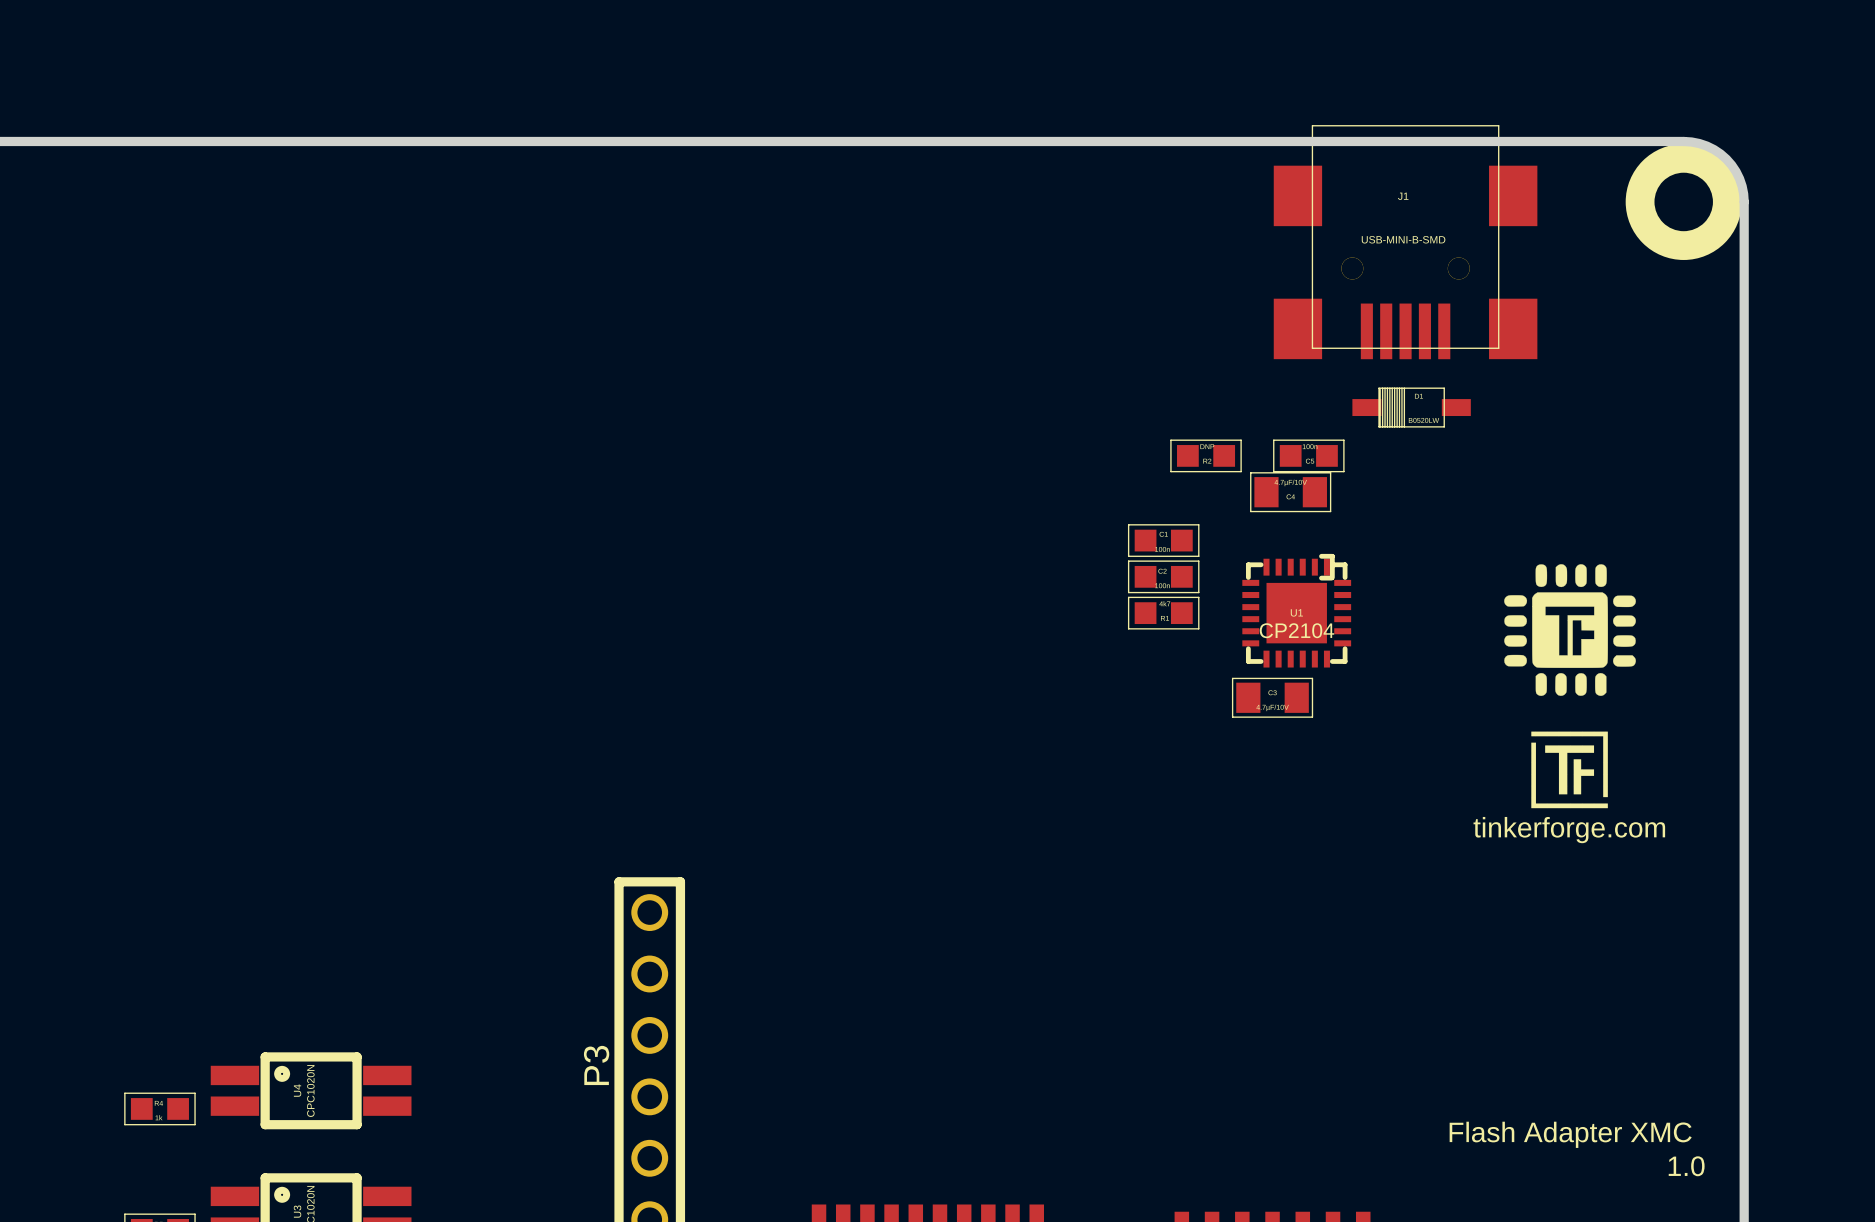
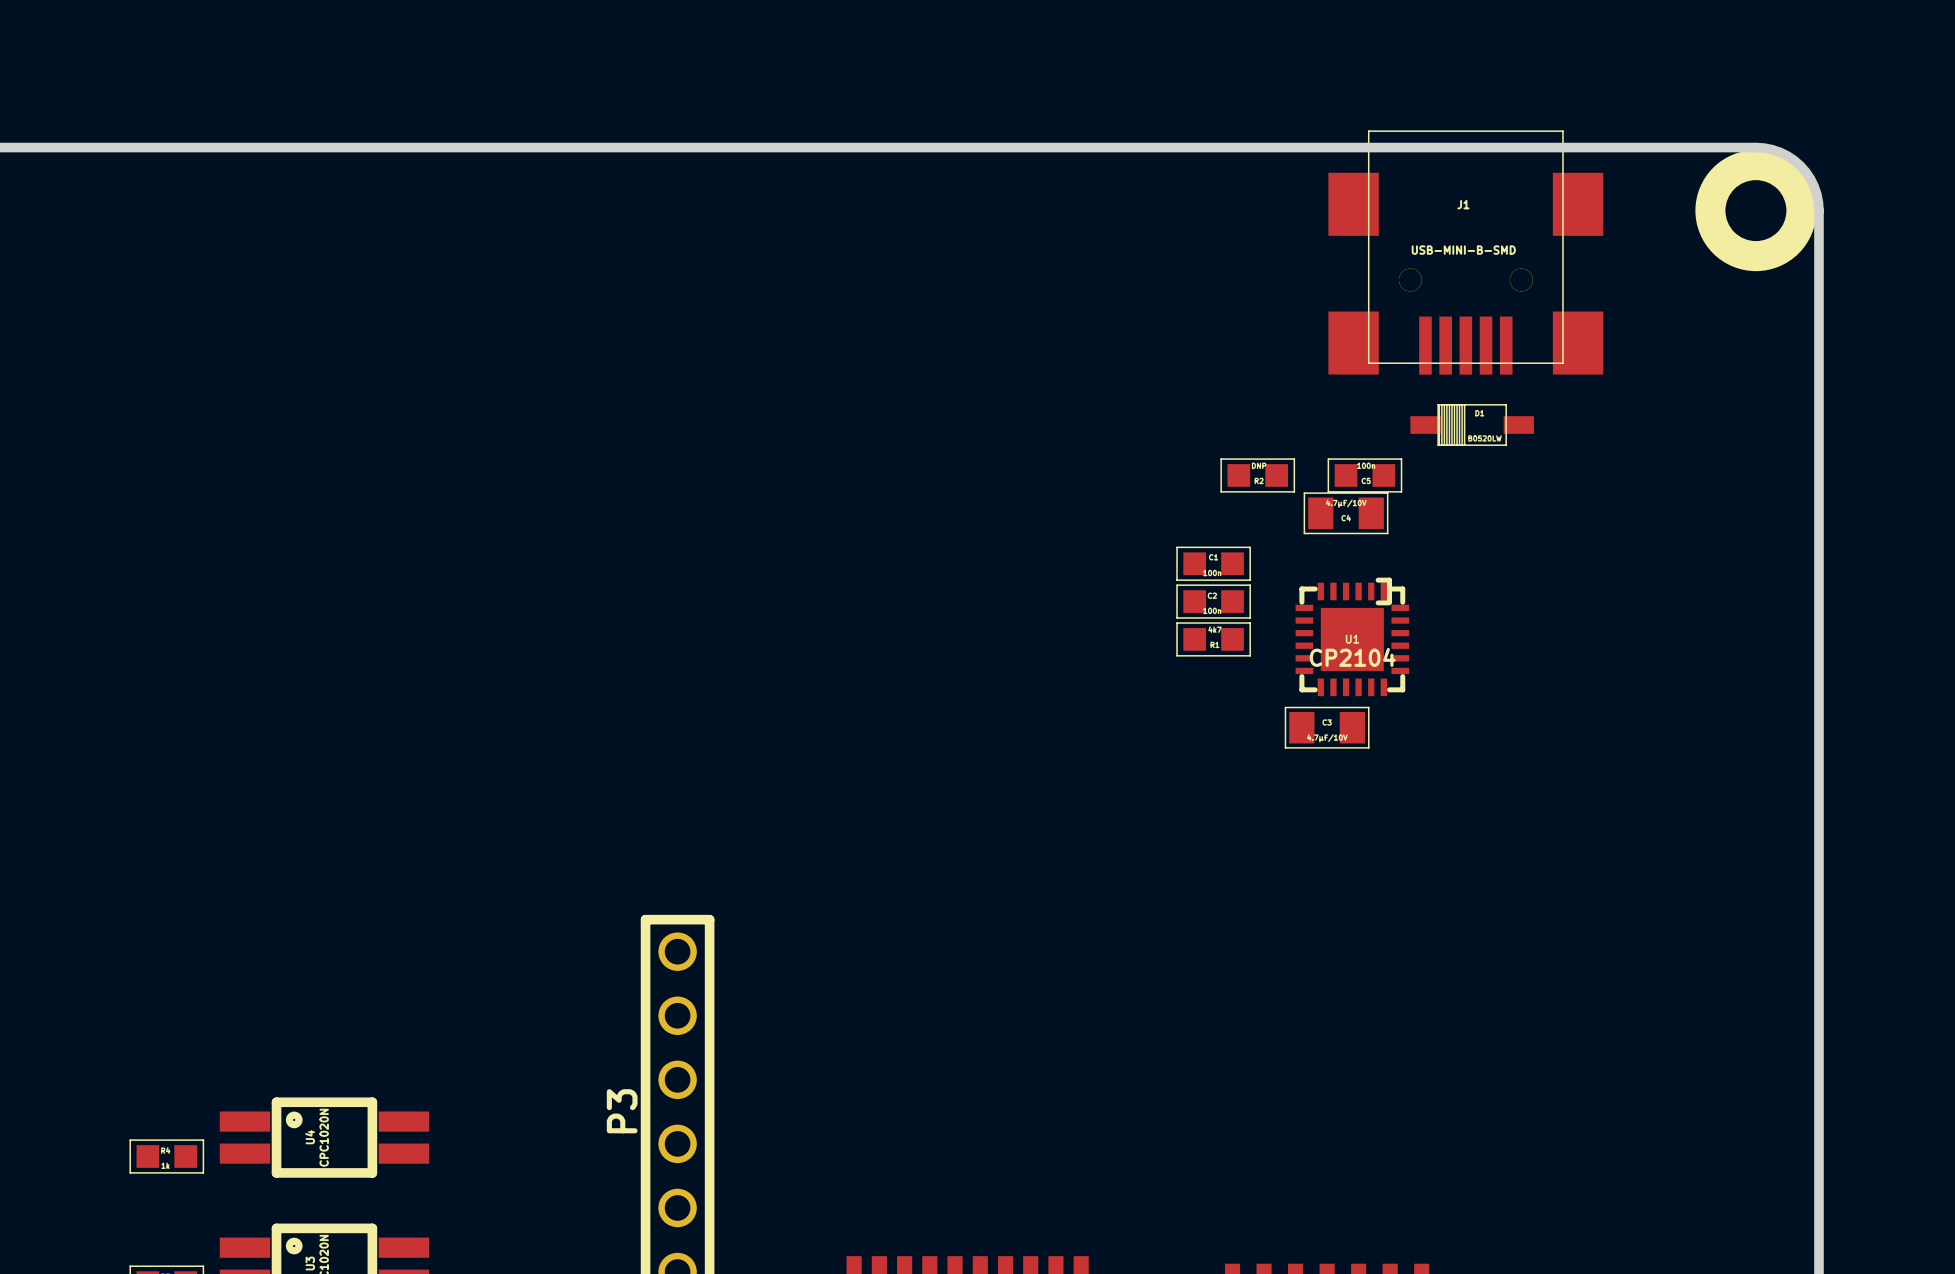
drawing: [1504, 564, 1636, 696] -> none
drawing: [1531, 731, 1608, 809] -> none
text: tinkerforge.com (1569, 830) -> none
text: Flash Adapter XMC (1570, 1134) -> none
text: 1.0 (1686, 1166) -> none

